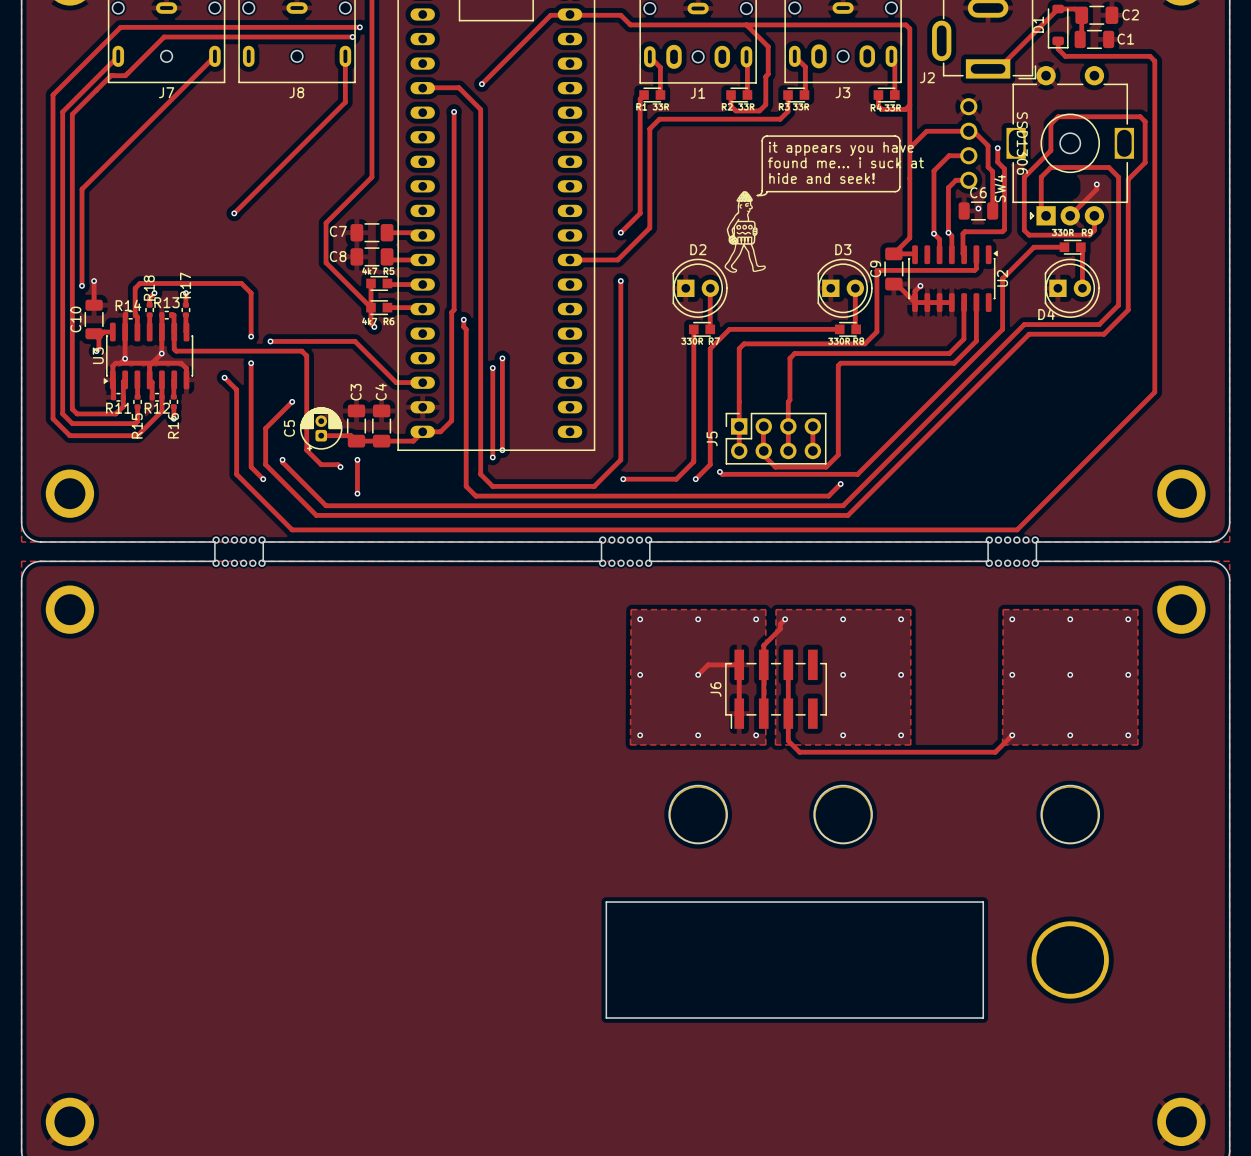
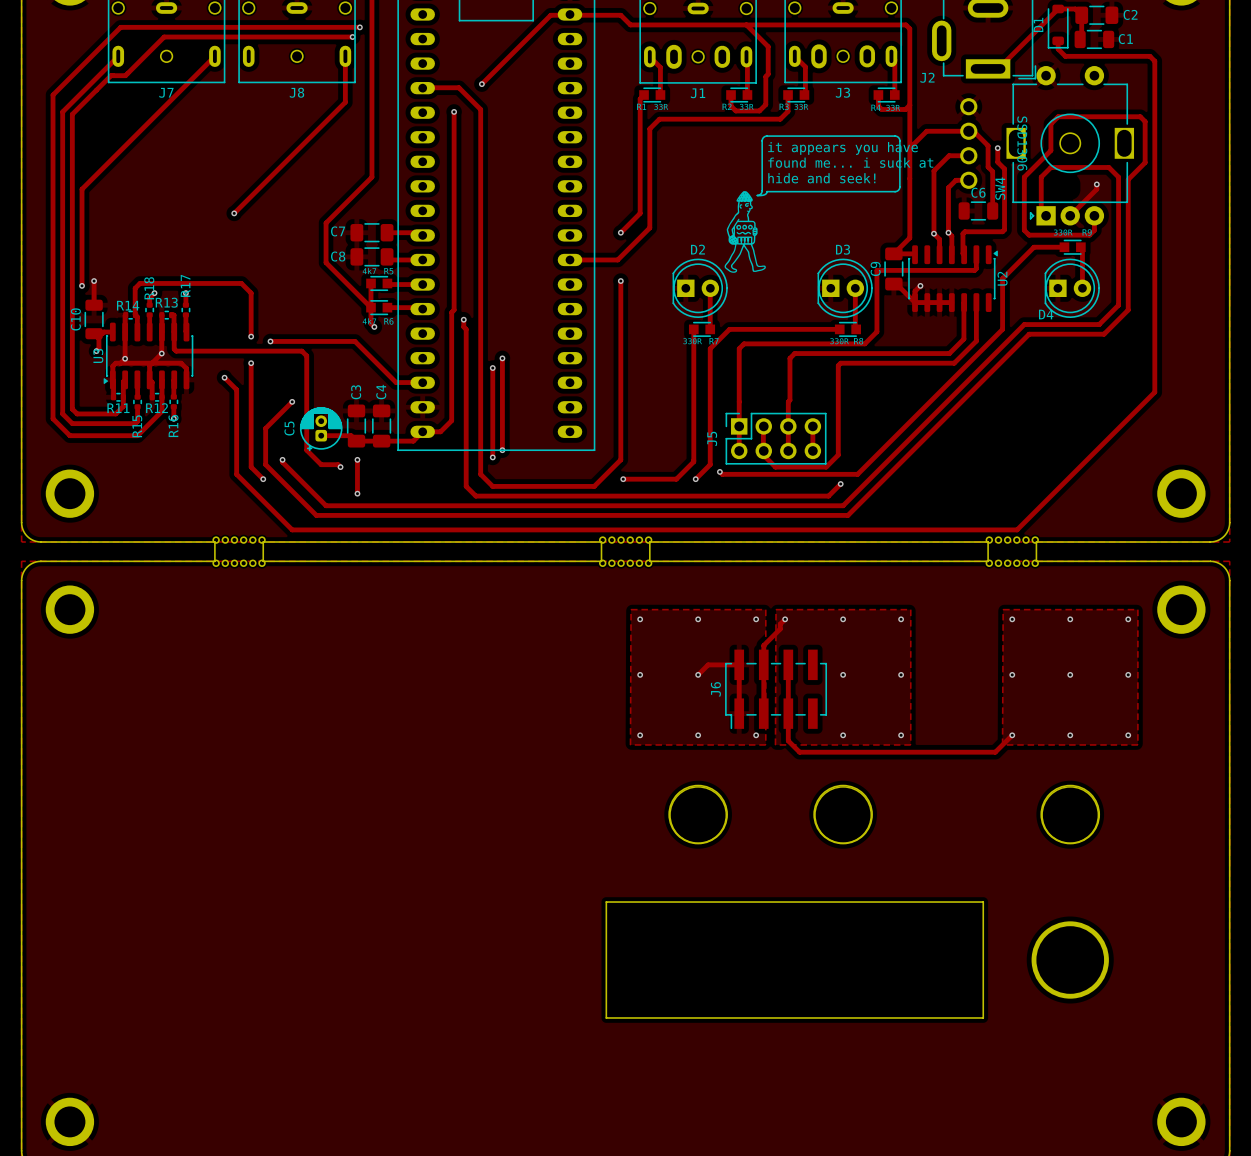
via: (978, 208) -> none

